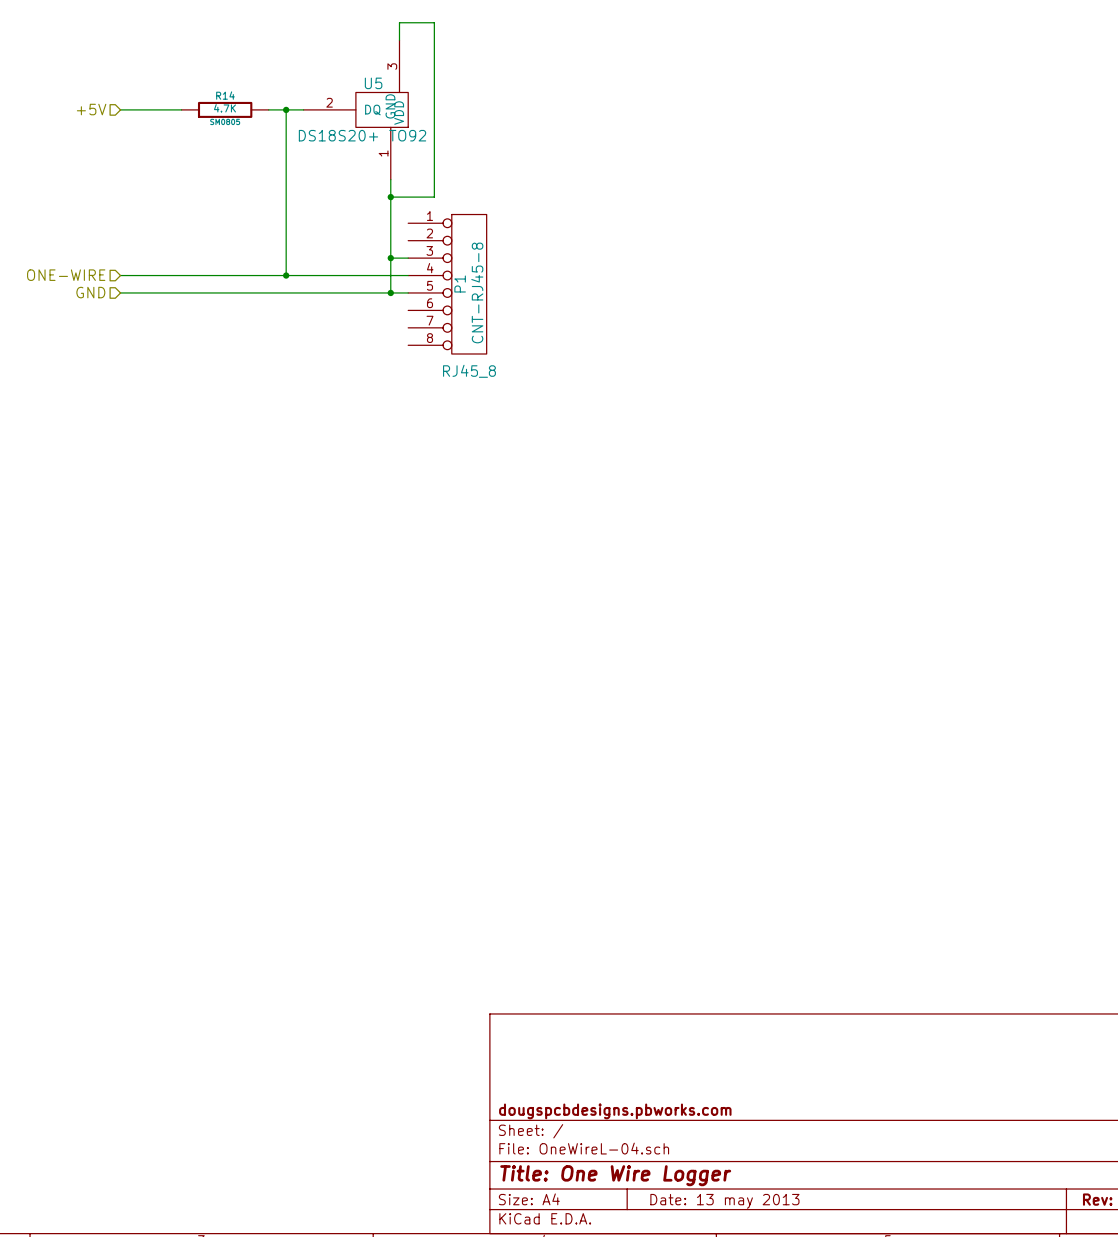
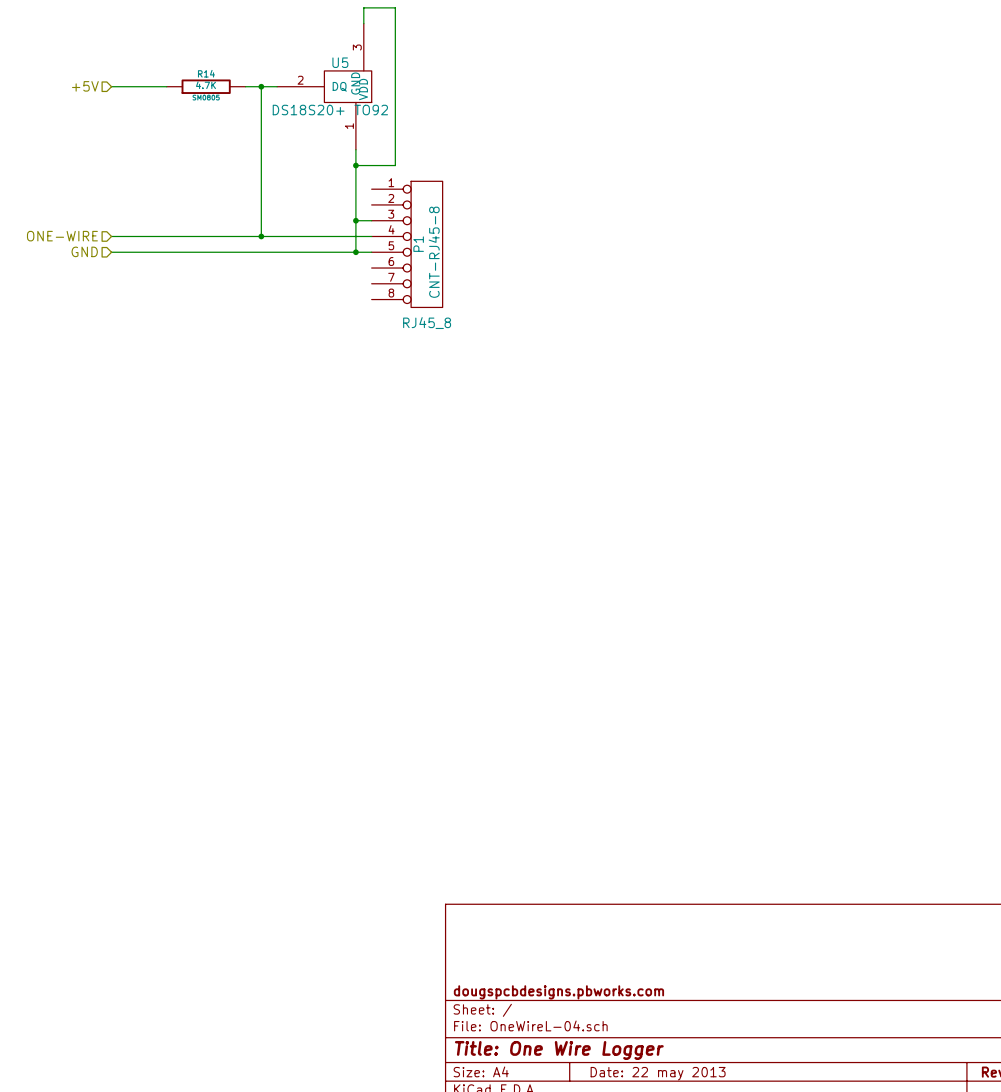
title block: Date: 13 may 2013 (724, 1201) -> Date: 22 may 2013 (658, 1073)

